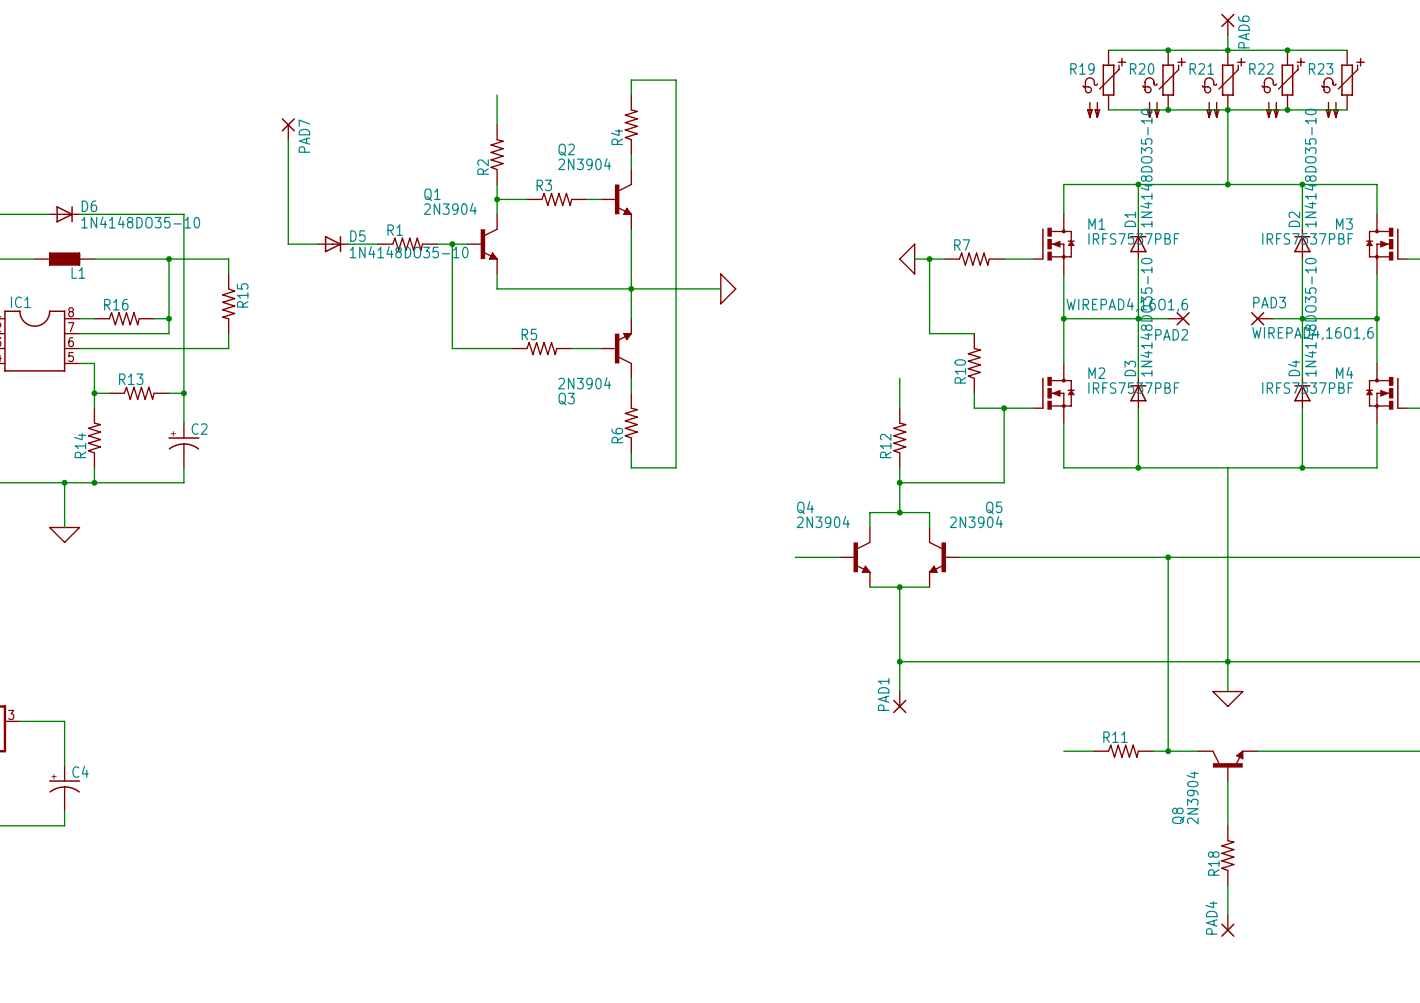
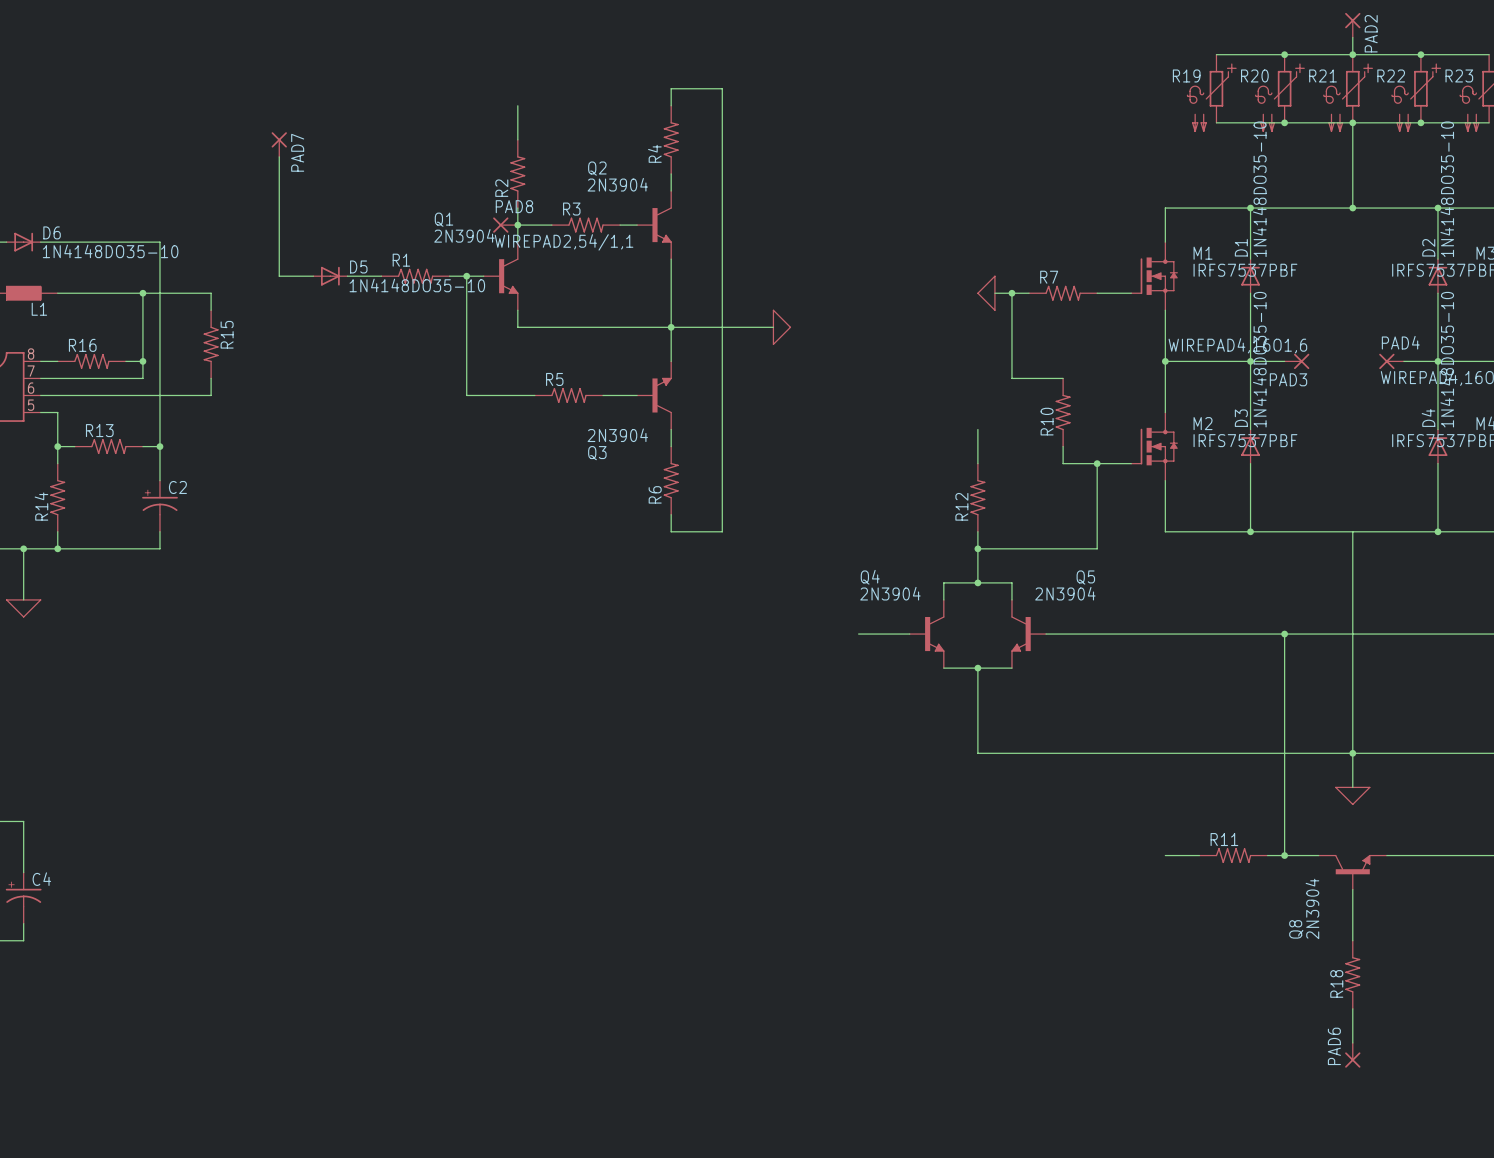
PAD6 name: PAD6 (1243, 31) -> PAD2 (1371, 33)
PAD8: none -> WIREPAD2,54/1,1 (505, 225)
PAD3 name: PAD3 (1269, 302) -> PAD4 (1400, 342)
PAD2 name: PAD2 (1171, 334) -> PAD3 (1288, 379)
wire: (899, 661) (899, 691) -> none
junction: (899, 661) -> none
PAD1: (899, 702) -> none
PAD4 name: PAD4 (1211, 917) -> PAD6 (1334, 1046)

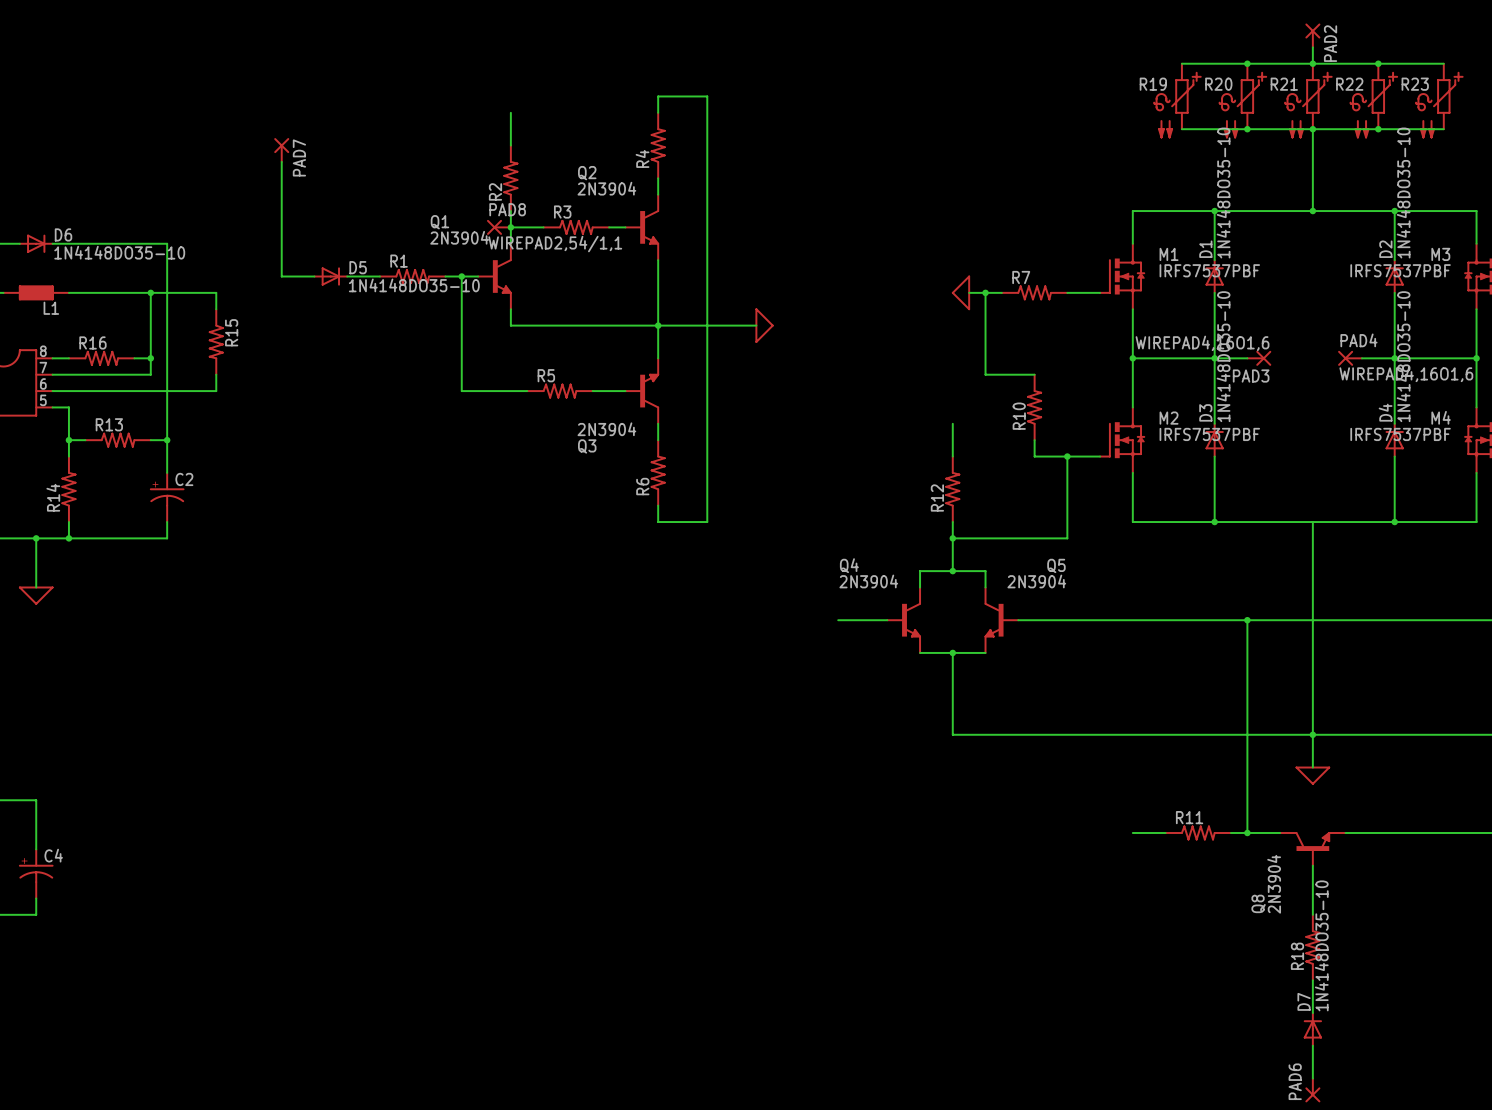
PAD6 position: (1352, 1055) -> (1312, 1090)
D7: none -> 1N4148DO35-10 (1312, 1029)
wire: none -> (1312, 1045) (1312, 1078)

